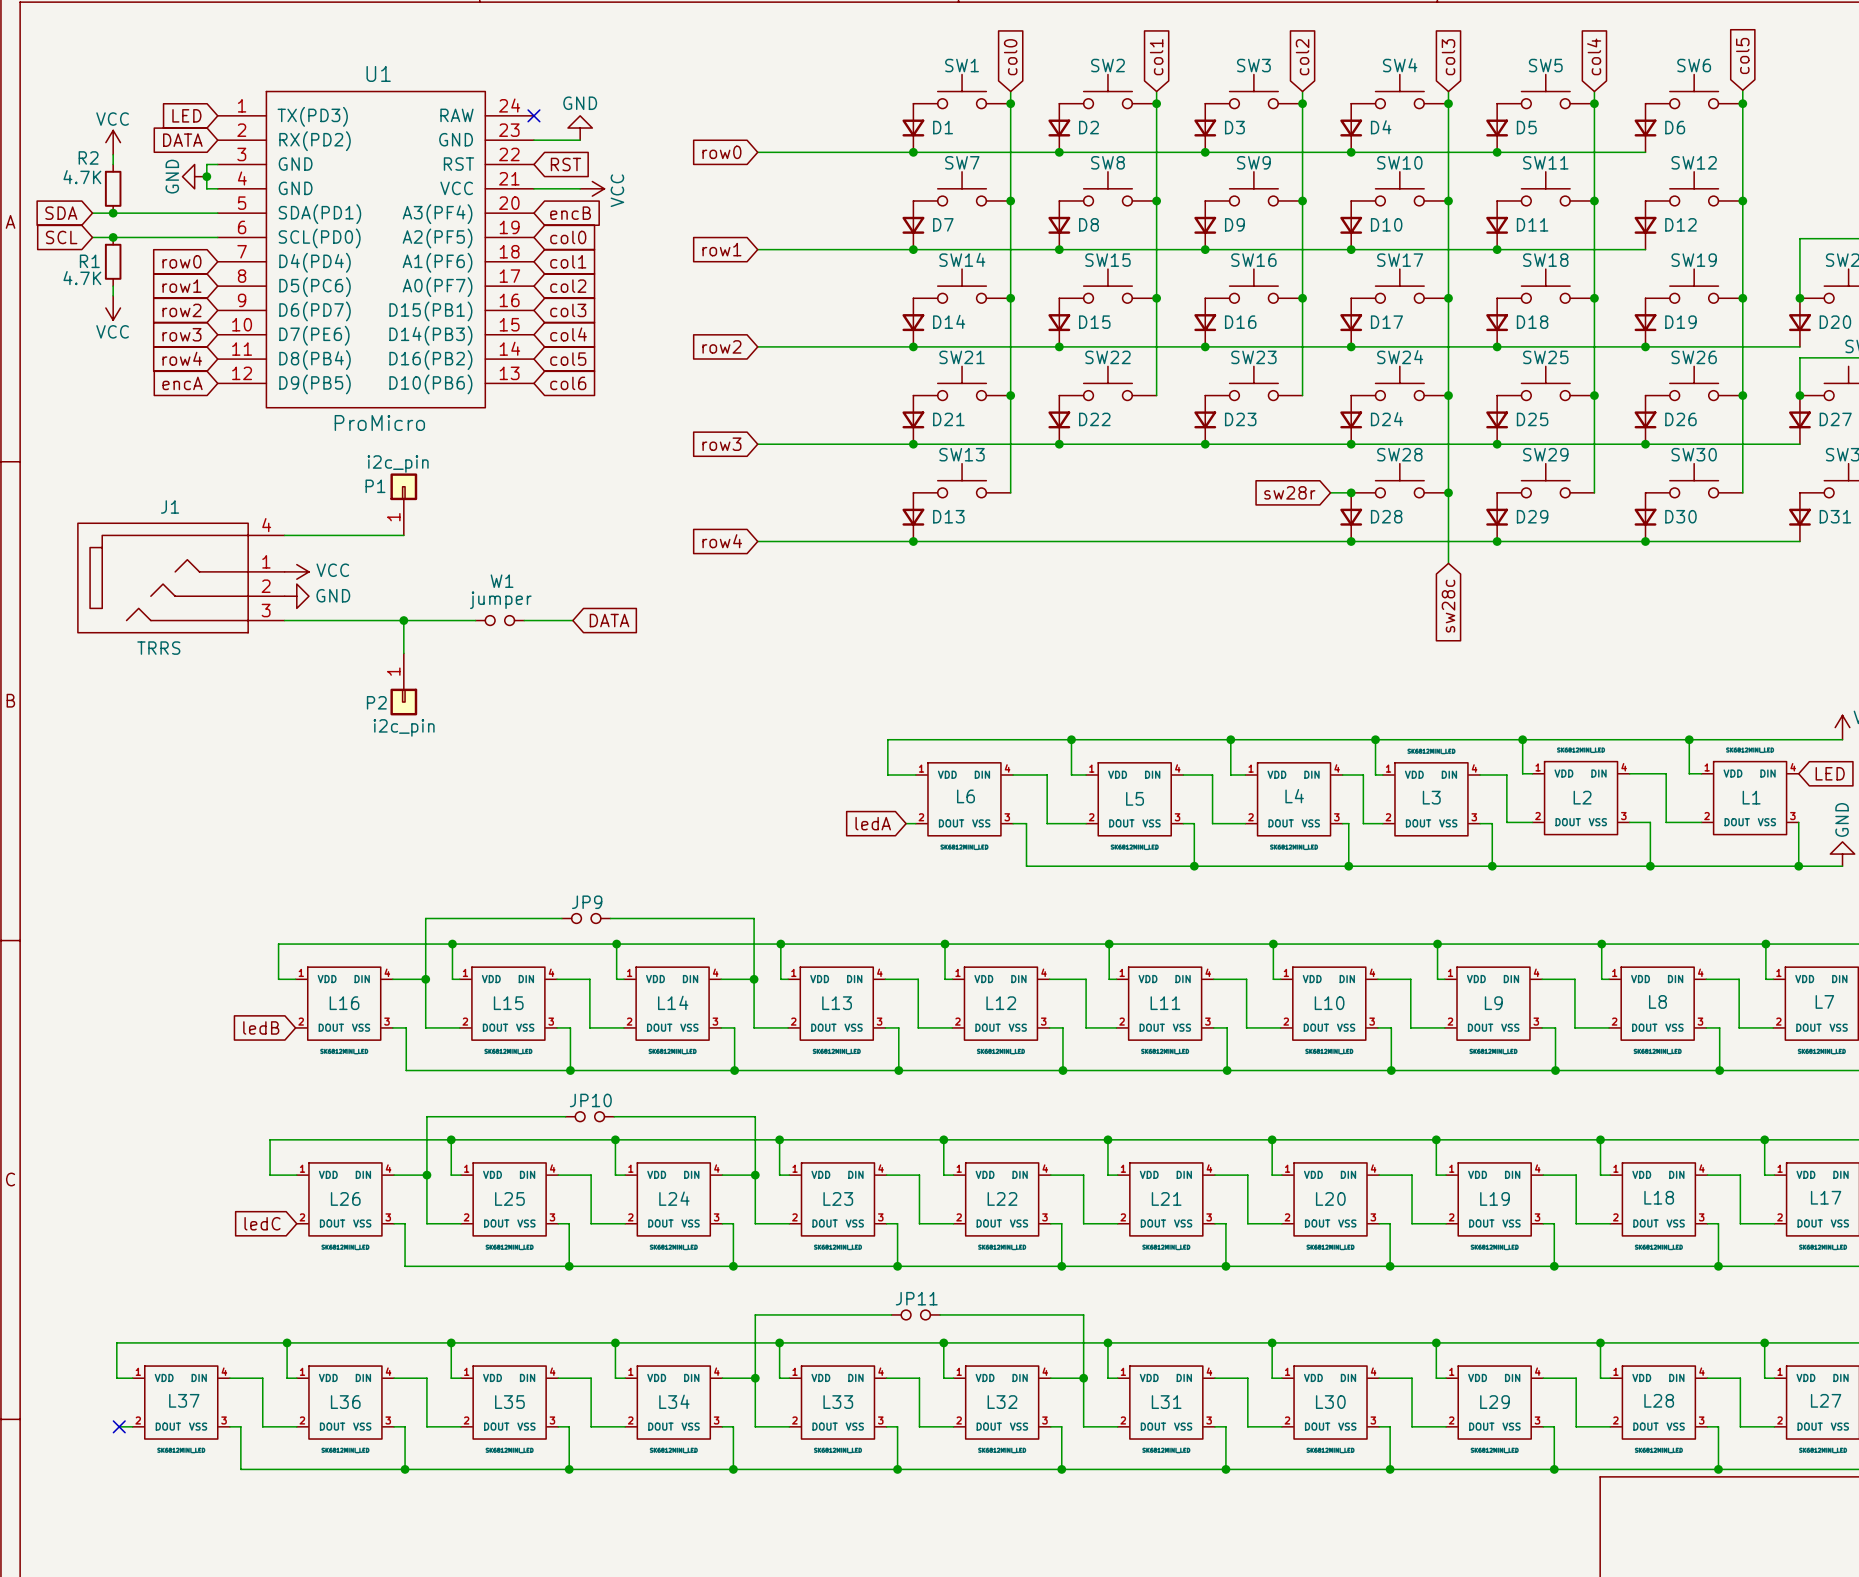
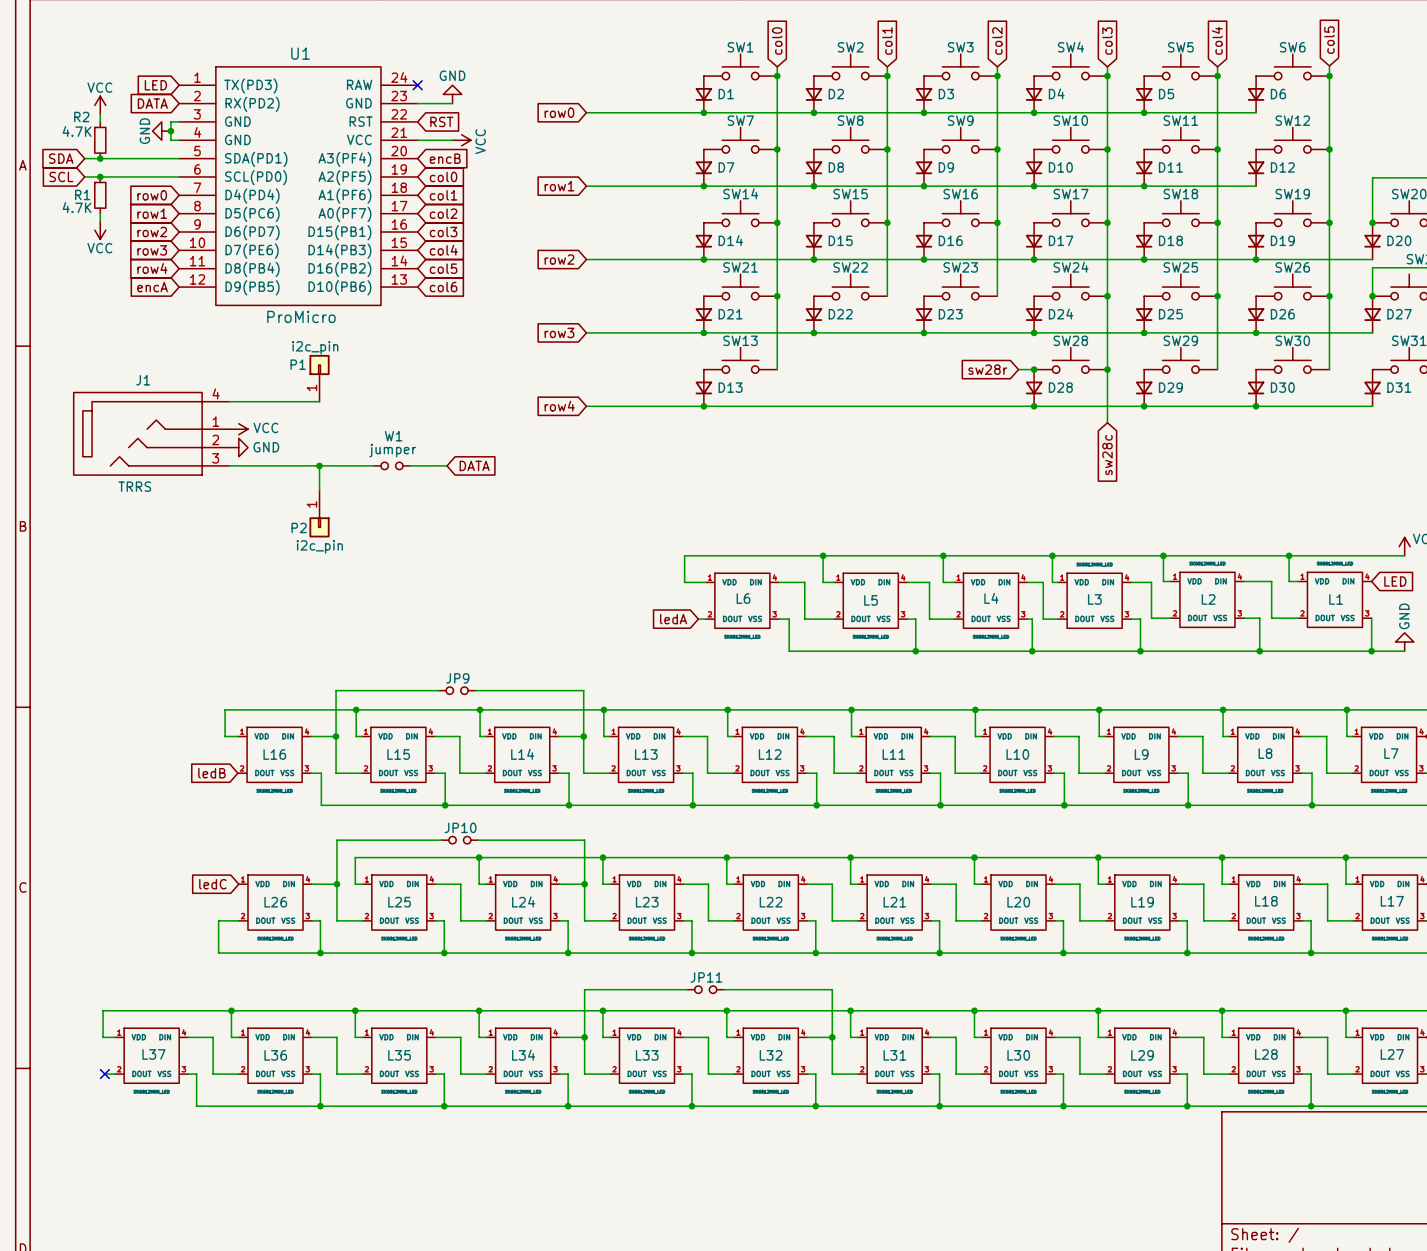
wire: (451, 1139) (270, 1139) (270, 1175) (296, 1175) -> none
junction: (451, 1139) -> none
global label position: ledC (262, 1223) -> ledC (212, 884)
wire: none -> (238, 920) (218, 920) (218, 952) (320, 952)
junction: none -> (320, 952)

